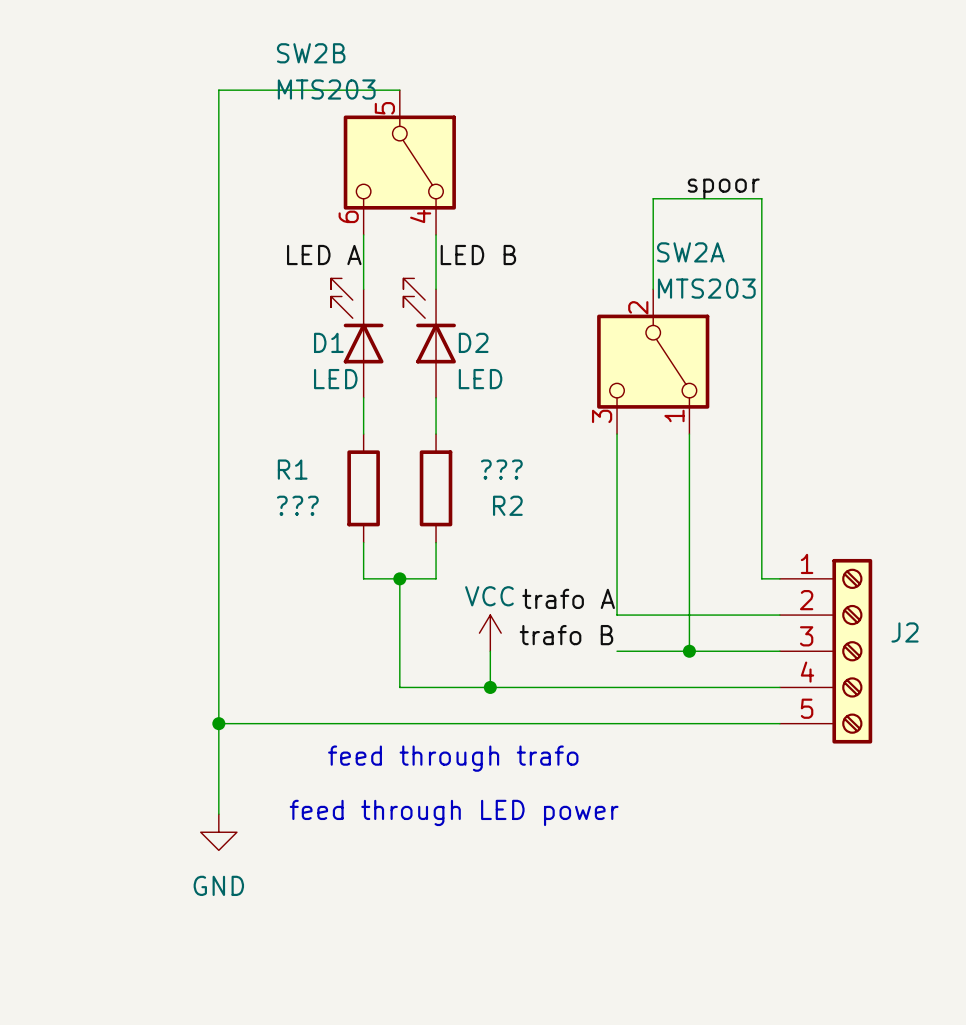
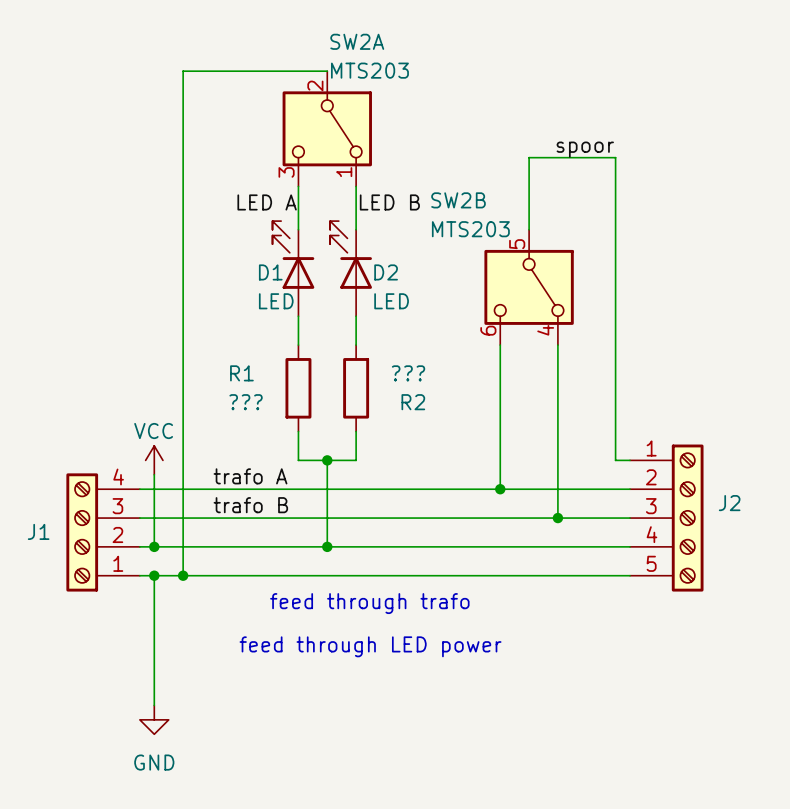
SW2B position: (399, 162) -> (529, 287)
SW2A position: (653, 361) -> (327, 128)
wire: none -> (154, 474) (154, 546)
label: none -> trafo A (250, 476)
label: trafo A (568, 598) -> none
wire: none -> (139, 489) (500, 489)
junction: none -> (500, 489)
power symbol position: VCC (490, 633) -> VCC (154, 460)
label: none -> trafo B (250, 505)
label: trafo B (566, 635) -> none
wire: none -> (139, 518) (500, 518)
wire: (490, 651) (490, 687) -> none
J1: none -> (103, 532)
wire: none -> (139, 546) (327, 546)
junction: none -> (154, 546)
junction: none -> (327, 546)
junction: (490, 687) -> none
wire: none -> (154, 575) (154, 705)
junction: none -> (154, 575)
wire: (218, 723) (218, 814) -> (183, 575) (139, 575)
power symbol position: GND (218, 832) -> GND (154, 719)

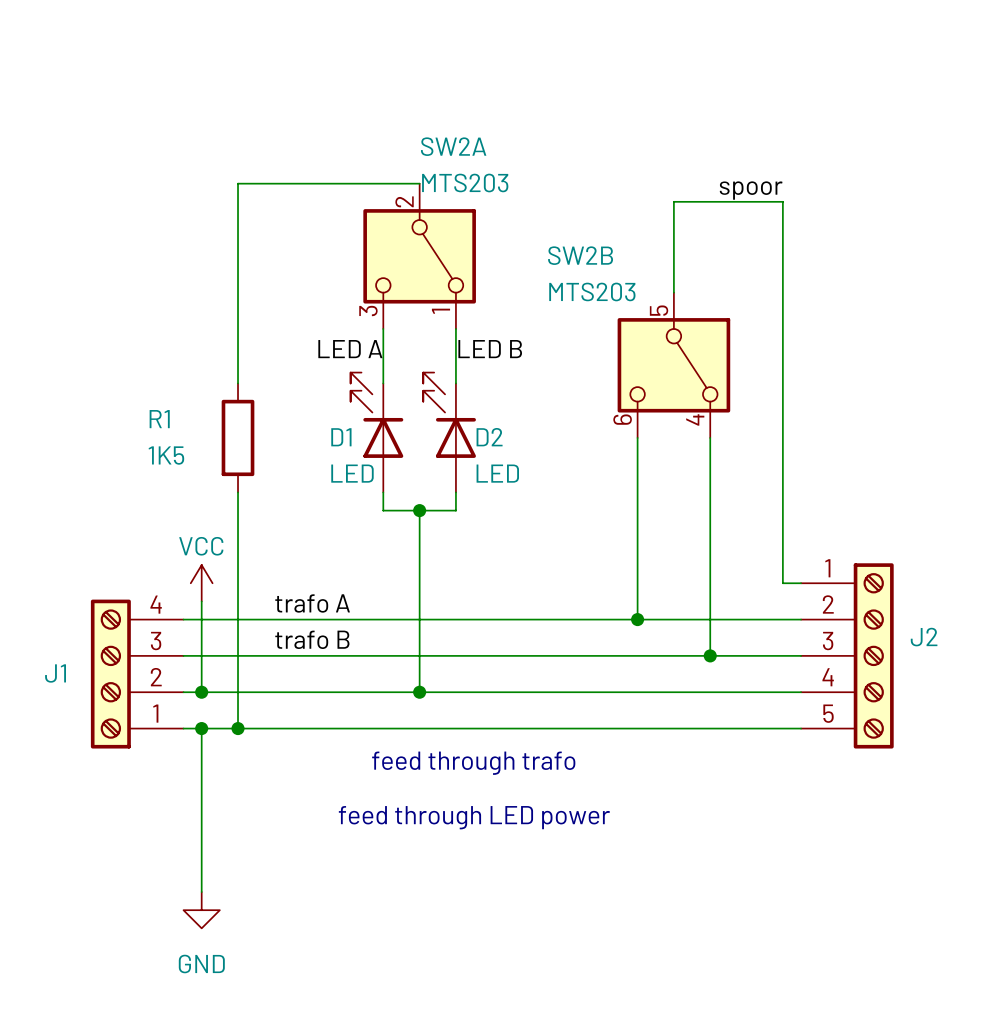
wire: (327, 71) (183, 71) (183, 143) -> (419, 183) (238, 183)
SW2A position: (327, 128) -> (419, 256)
label position: LED A (267, 202) -> LED A (350, 349)
label position: LED B (389, 202) -> LED B (490, 349)
D1 position: (293, 268) -> (376, 432)
D2 position: (351, 268) -> (449, 432)
wire: (183, 301) (183, 388) -> none
wire: none -> (383, 492) (383, 510) (455, 510) (455, 492)
R1 position: (298, 388) -> (238, 437)
R2: ??? (356, 388) -> none
R1 value: ??? (246, 402) -> 1K5 (166, 455)
wire: none -> (419, 510) (419, 583)
wire: (298, 431) (298, 460) (356, 460) (356, 431) -> none
junction position: (327, 460) -> (419, 510)

